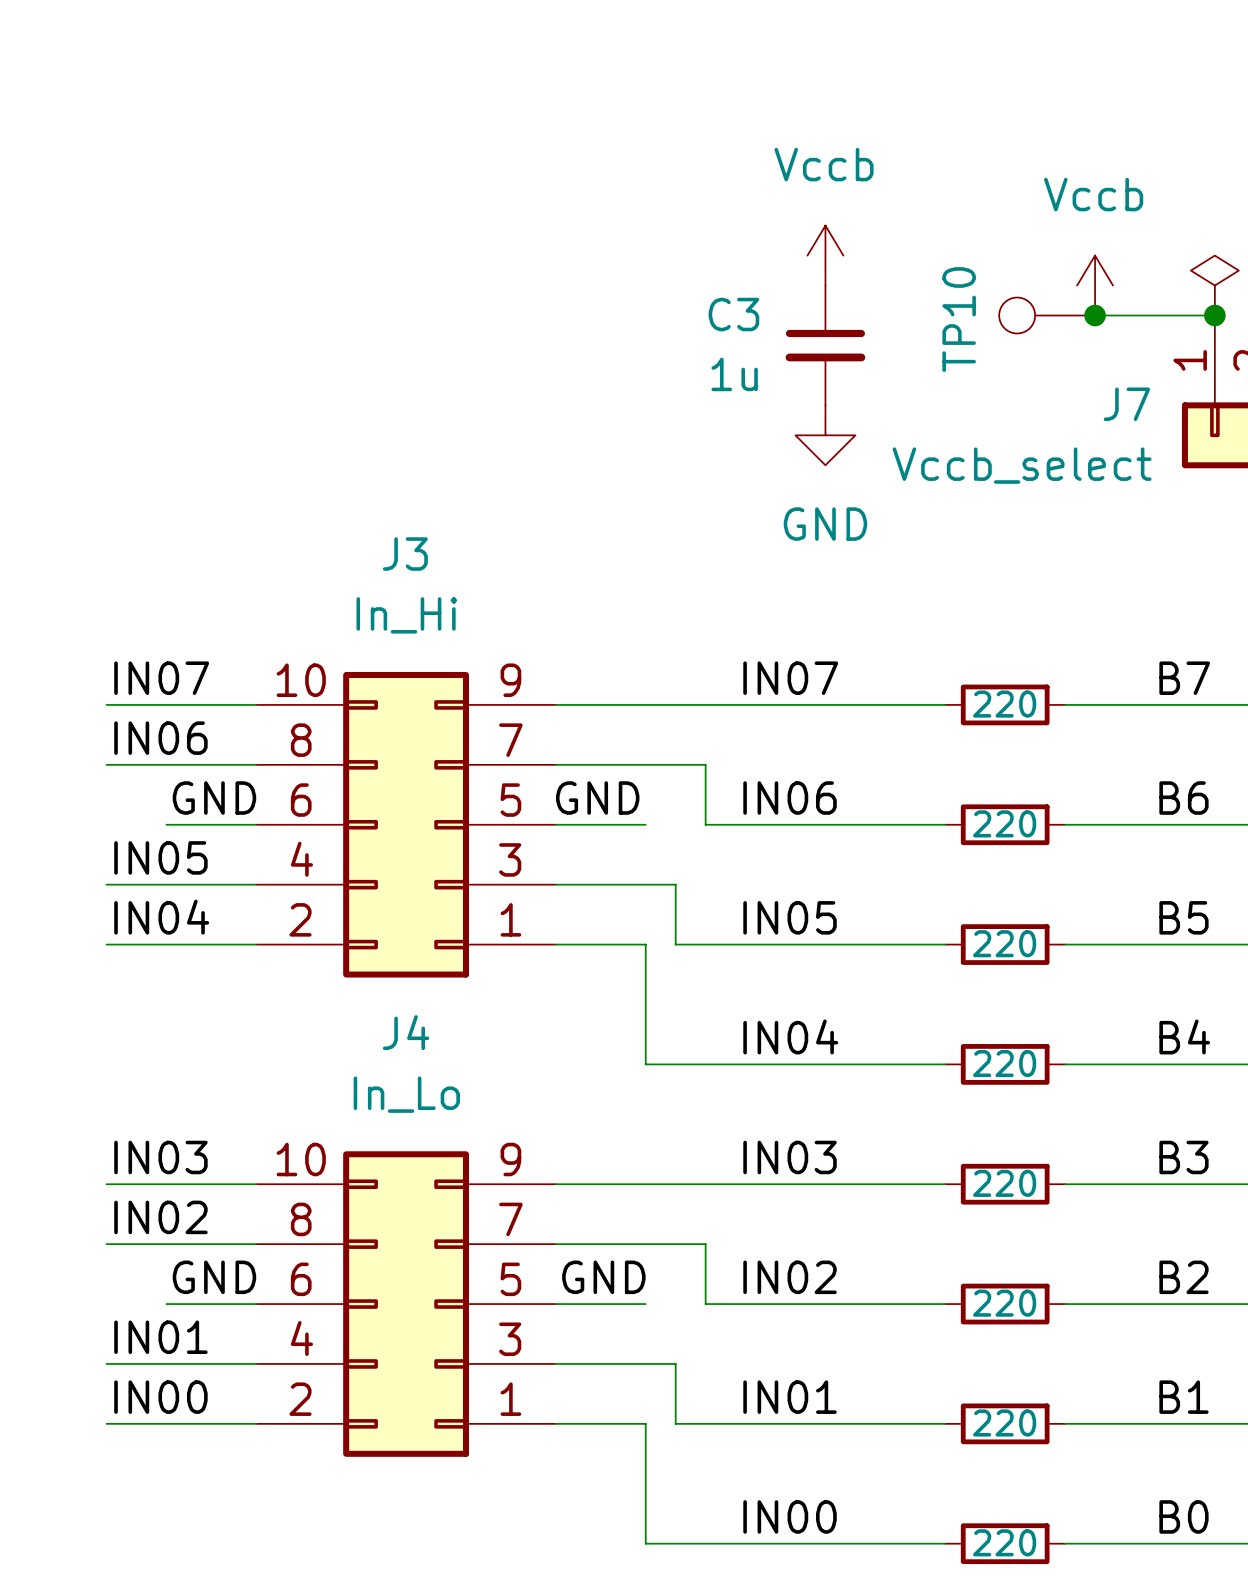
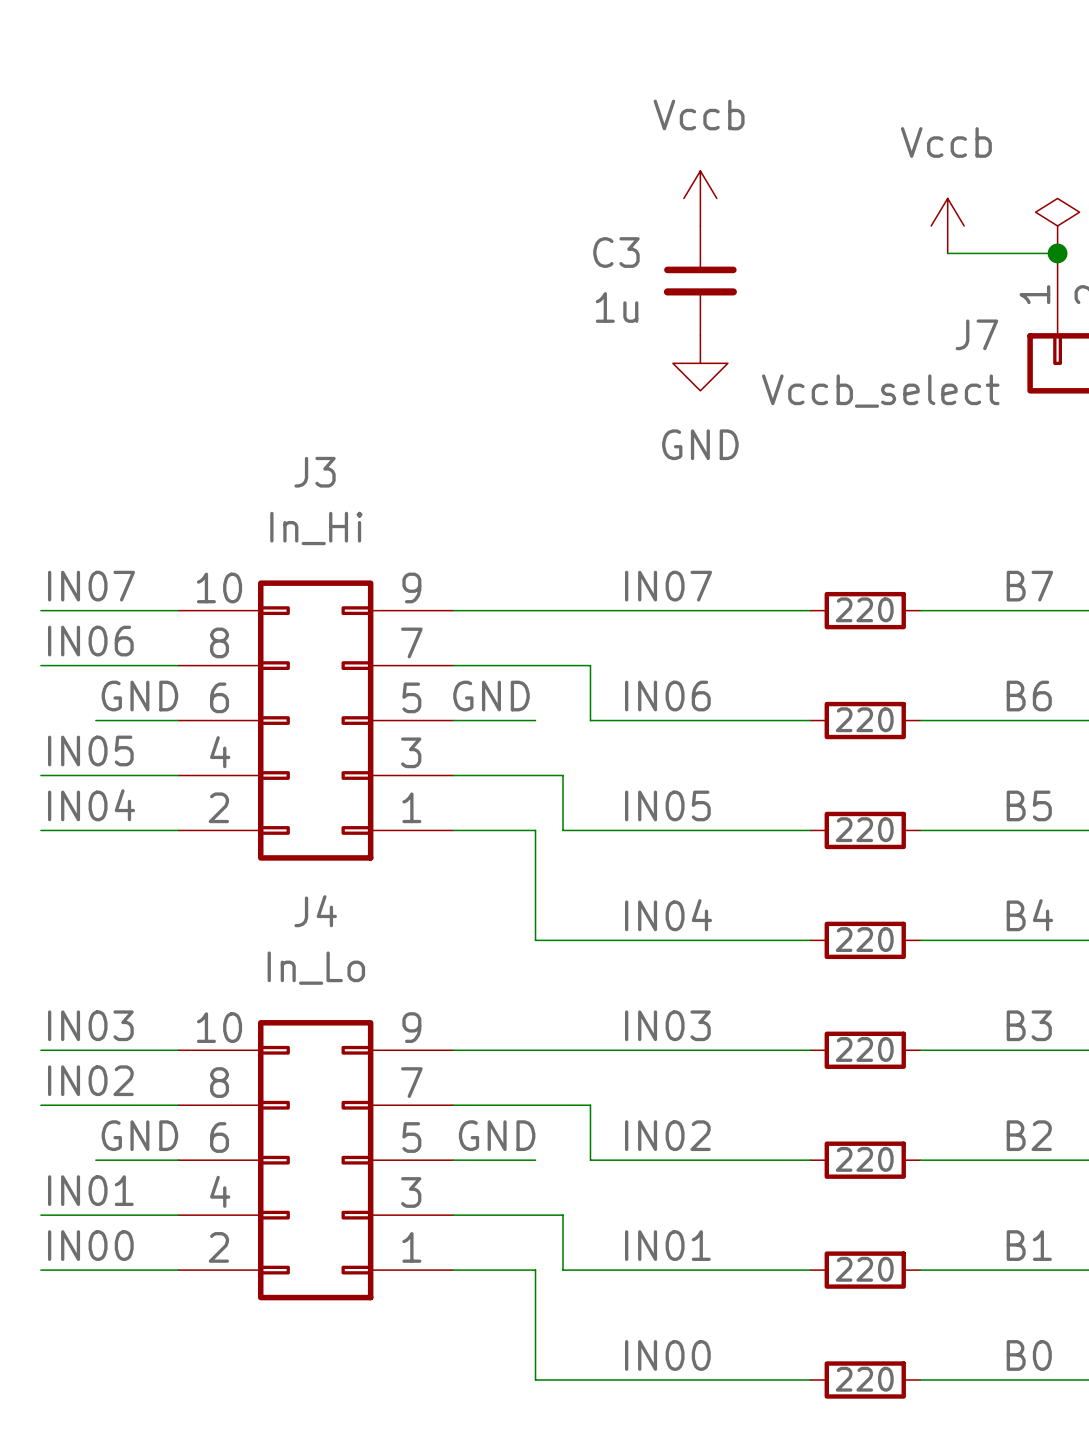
TP10: (1047, 315) -> none
junction: (1095, 315) -> none

